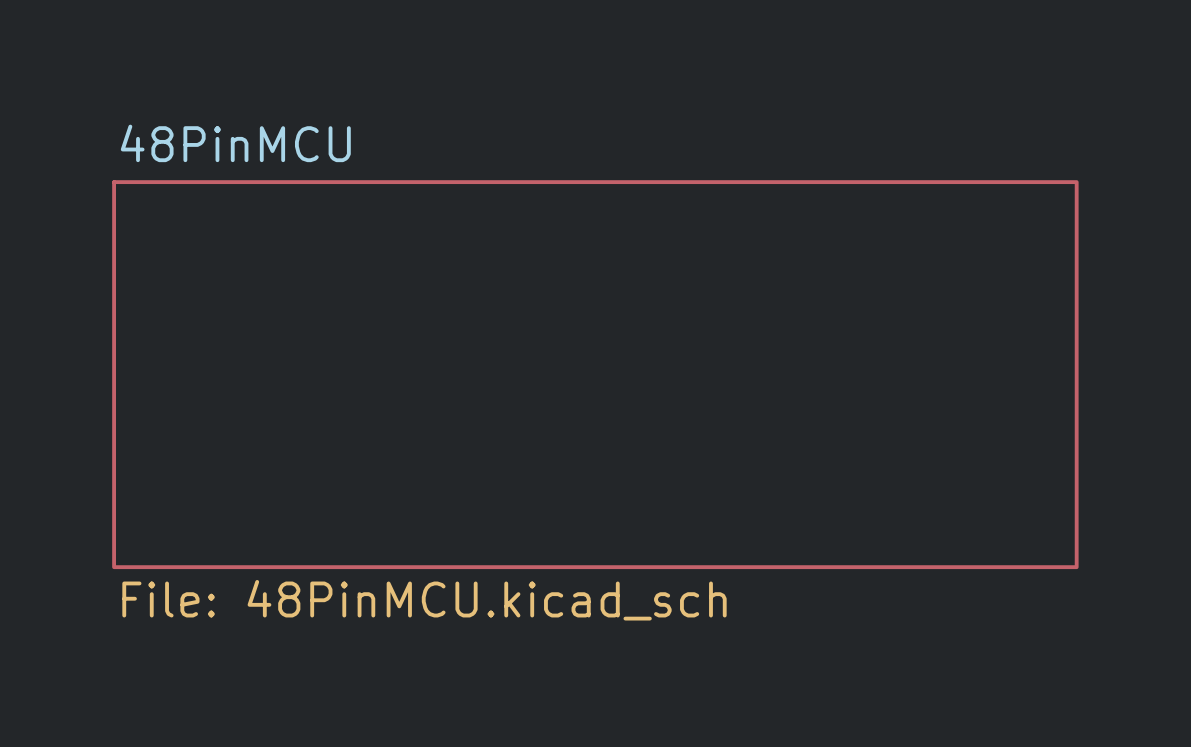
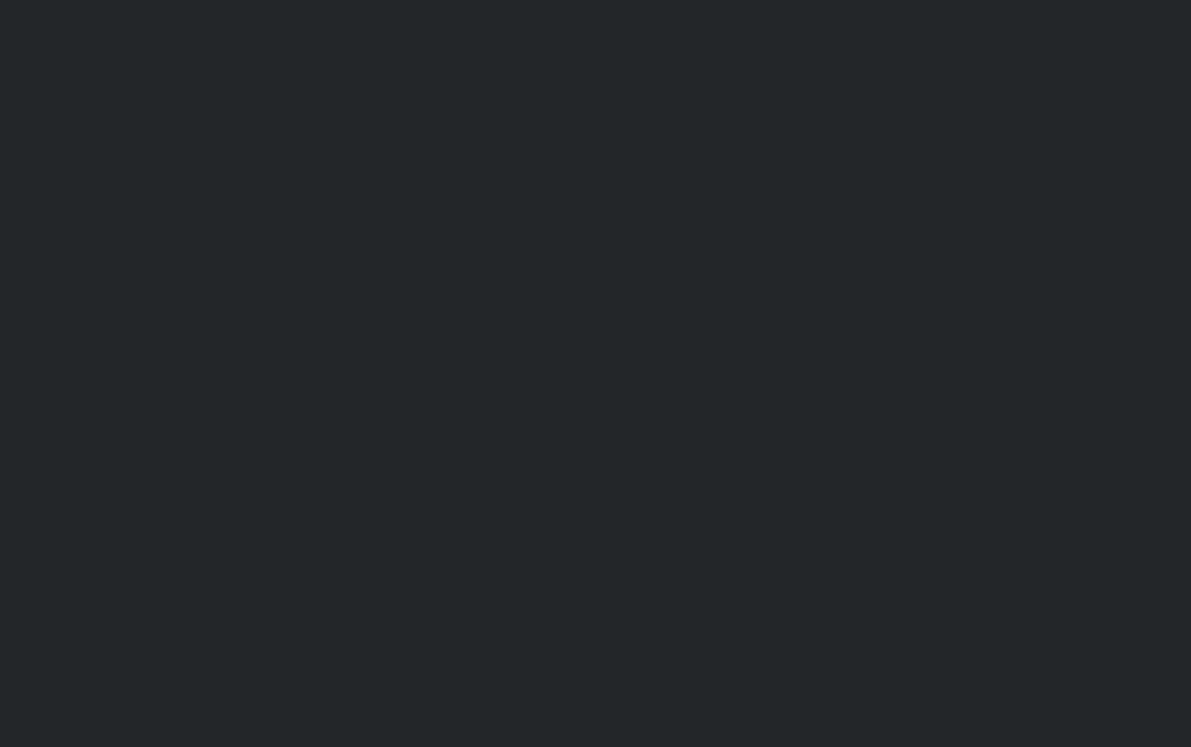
sheet 48PinMCU: File: 48PinMCU.kicad_sch (595, 374) -> none

